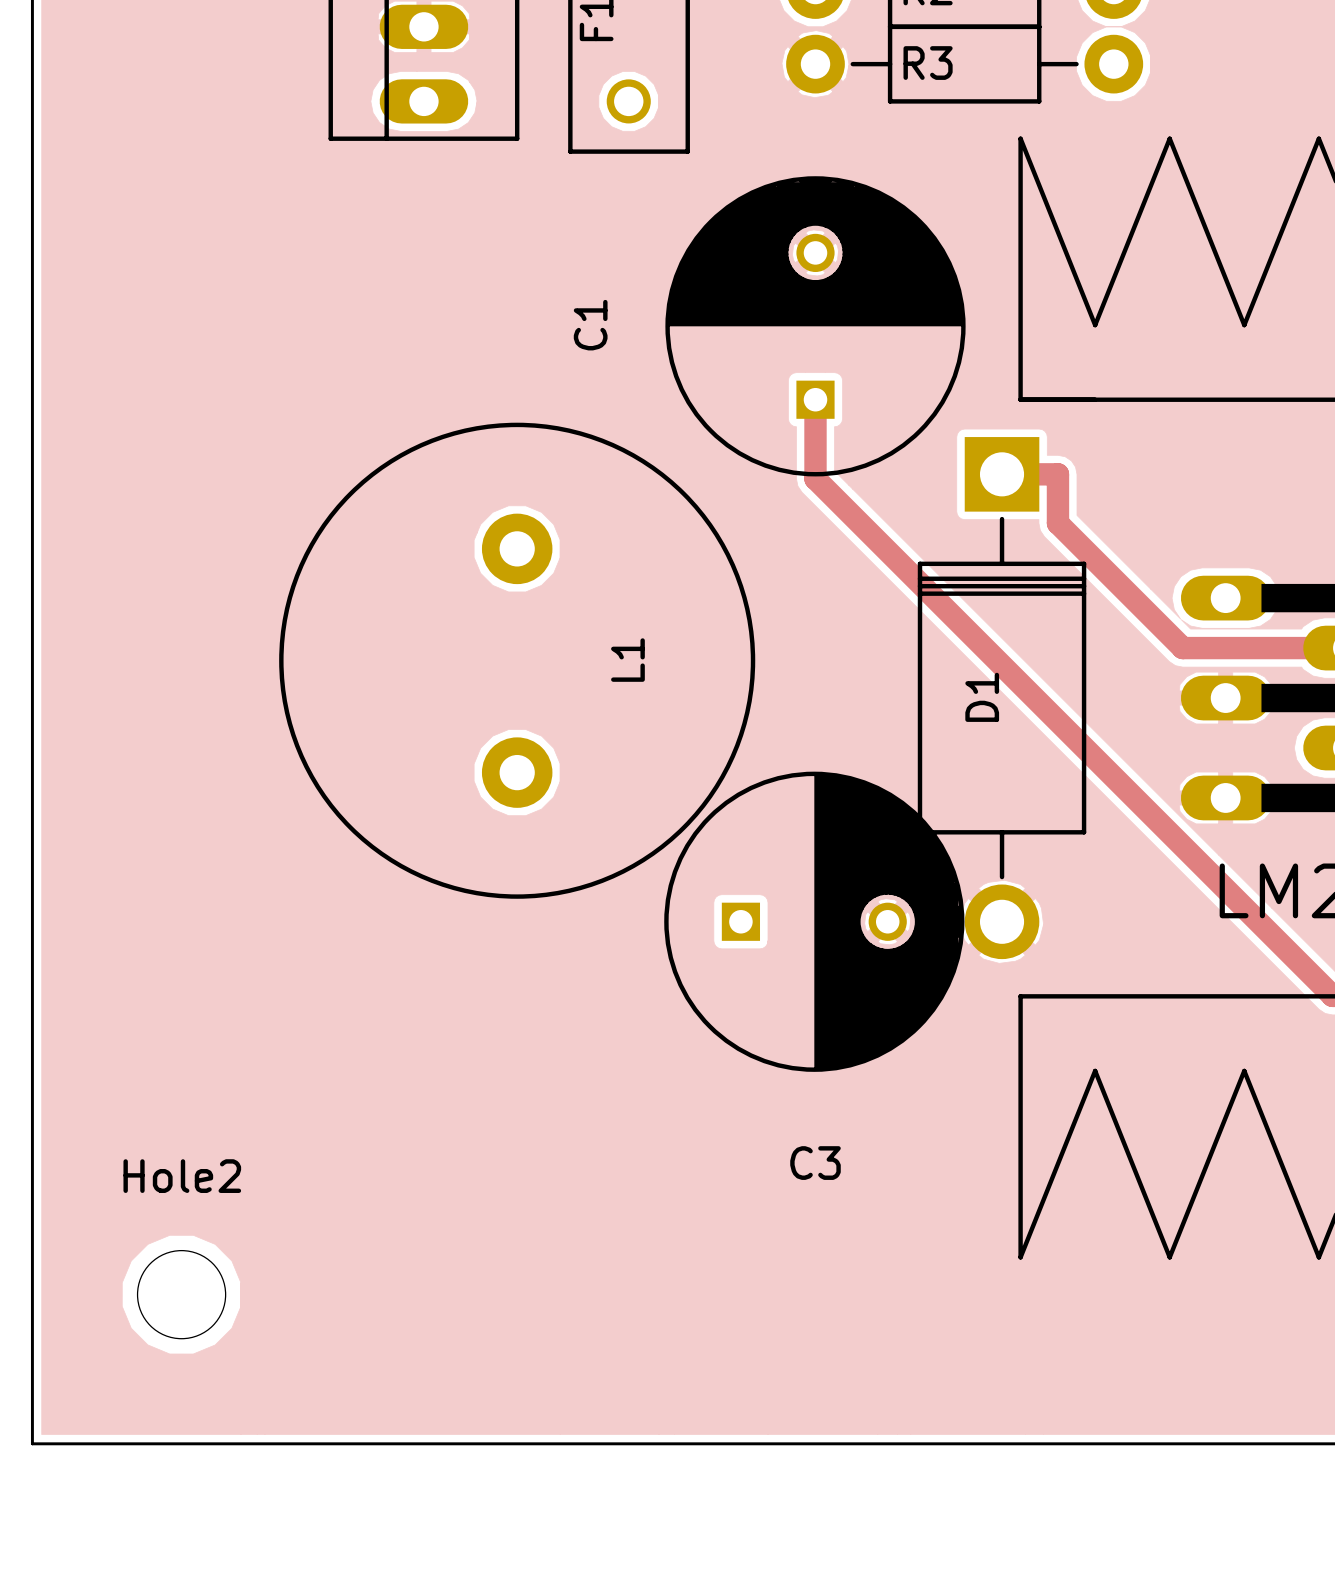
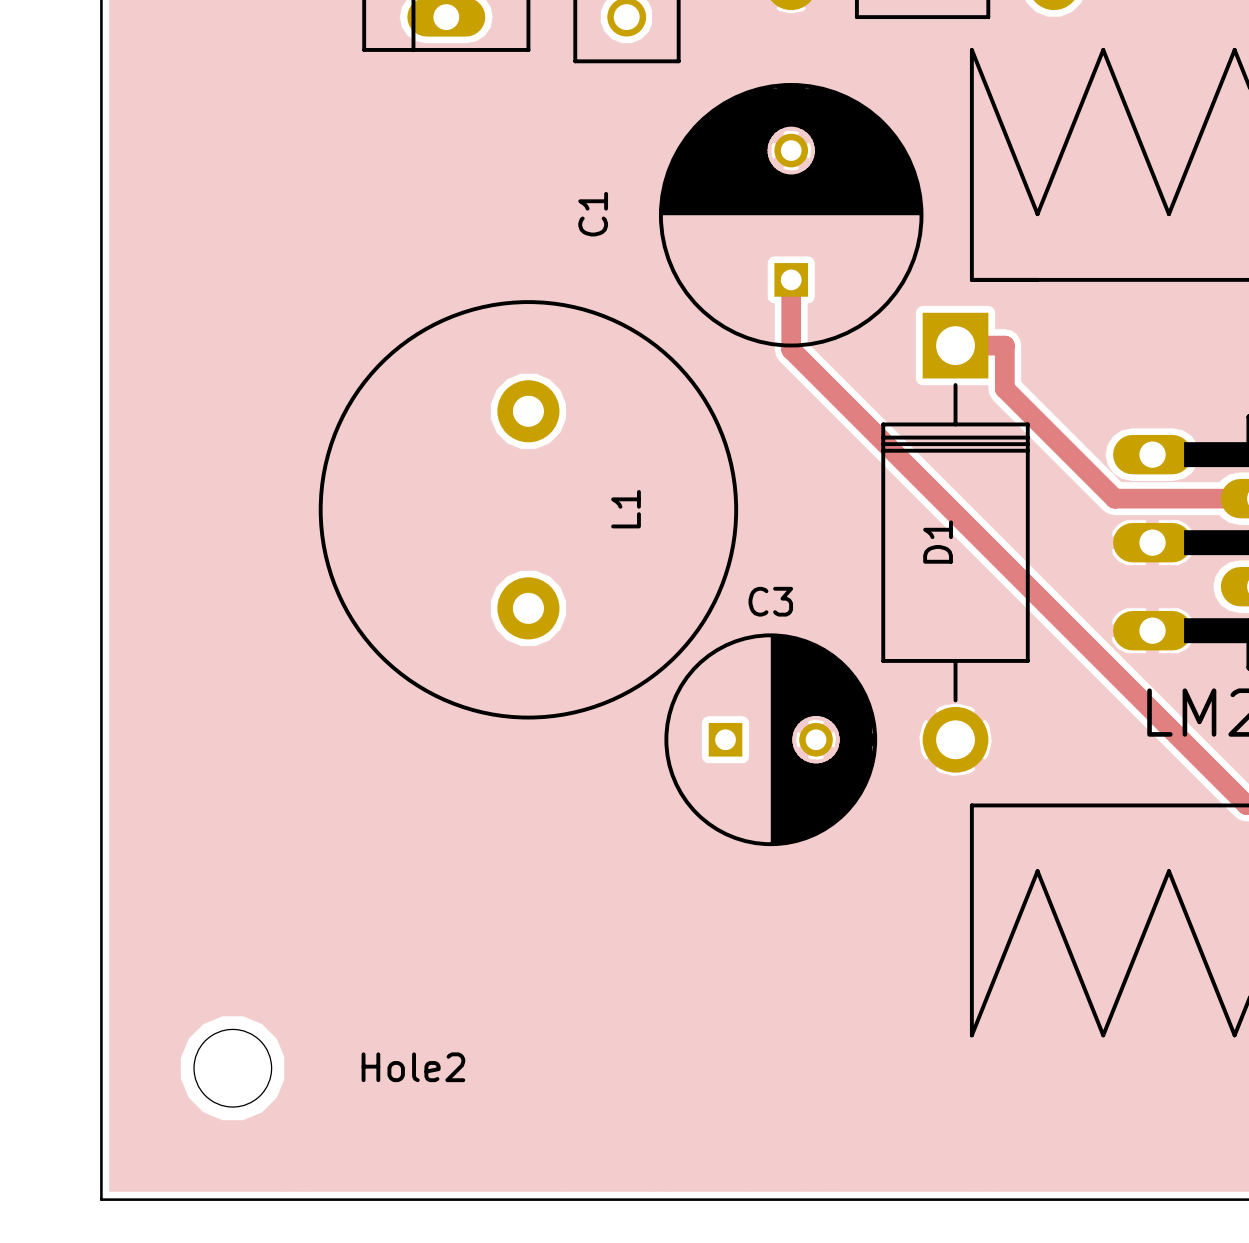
C3 footprint: [664, 771, 965, 1072] -> [664, 633, 878, 847]
C3 name position: C3 (815, 1163) -> C3 (770, 601)
Hole2 name position: Hole2 (182, 1176) -> Hole2 (413, 1067)

